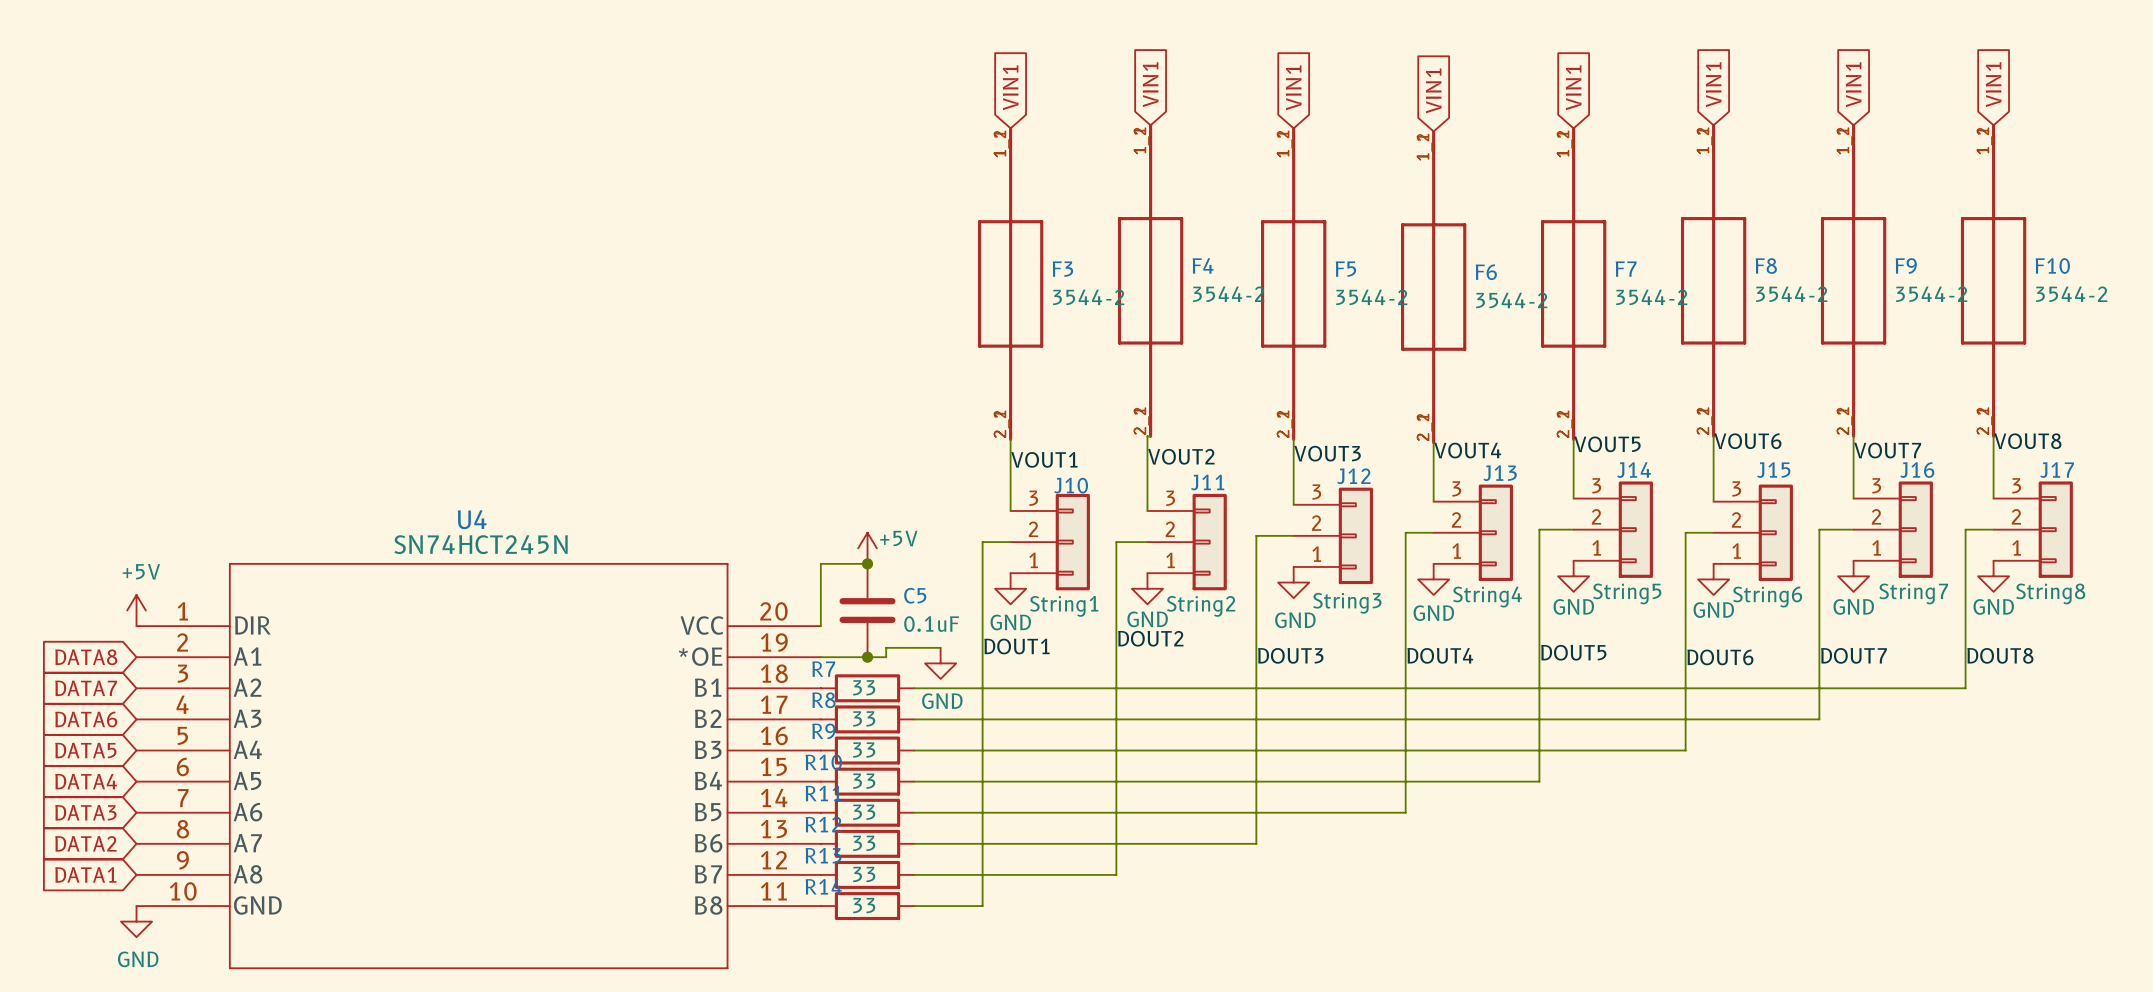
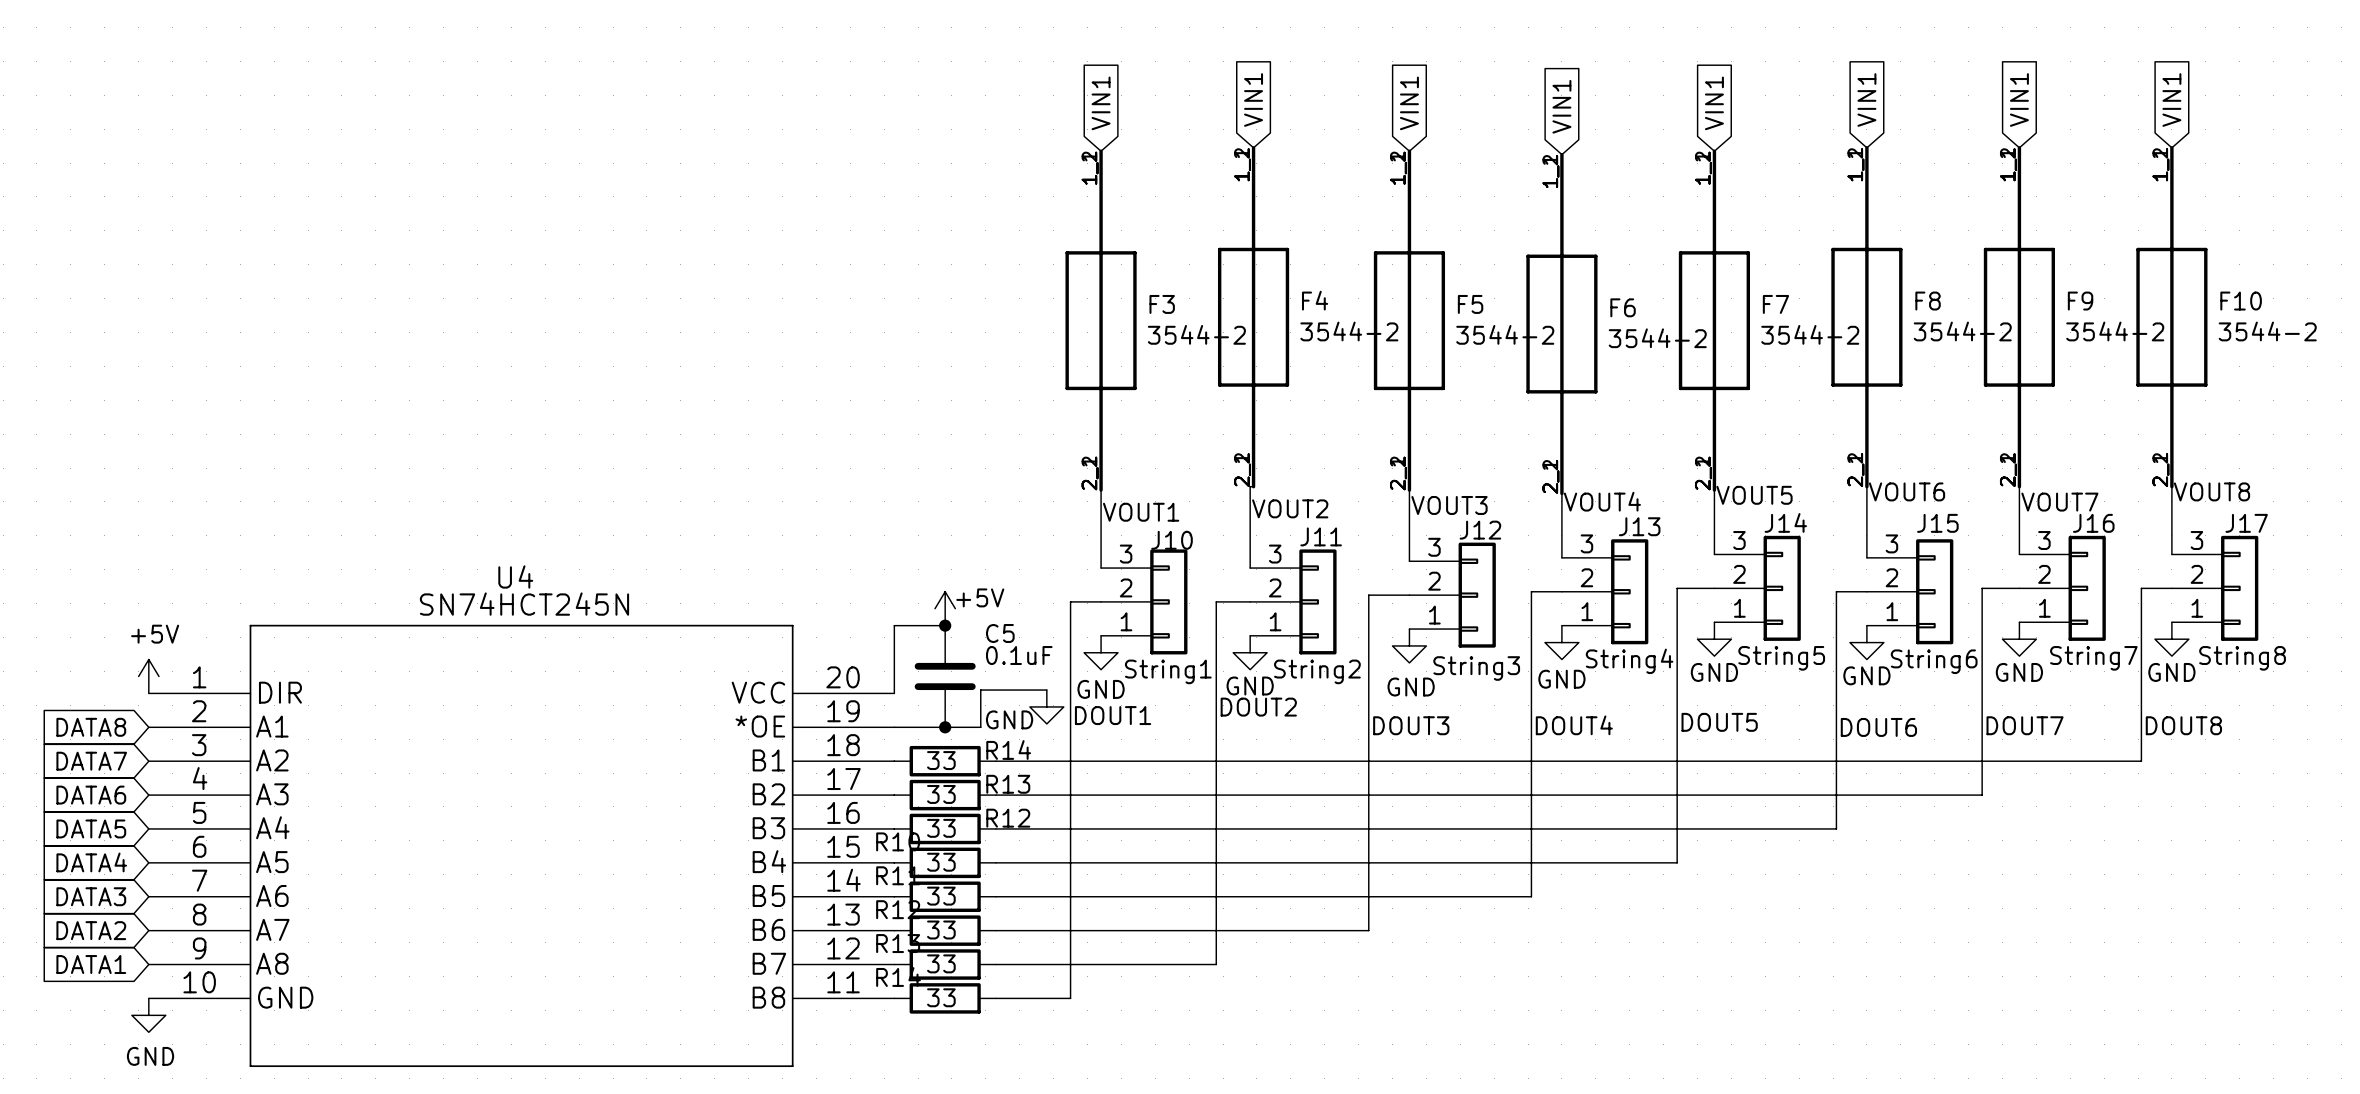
C5 name position: C5 (915, 595) -> C5 (1000, 633)
C5 value position: 0.1uF (931, 624) -> 0.1uF (1019, 655)
wire: (940, 647) (886, 647) (886, 657) -> (1046, 690) (980, 690) (980, 727) (965, 727)
power symbol position: GND (940, 663) -> GND (1046, 706)
R7 name: R7 (823, 669) -> R14 (1008, 749)
R8 name: R8 (823, 700) -> R13 (1008, 784)
power symbol text position: GND (942, 701) -> GND (1009, 719)
R9 name: R9 (823, 731) -> R12 (1008, 818)

